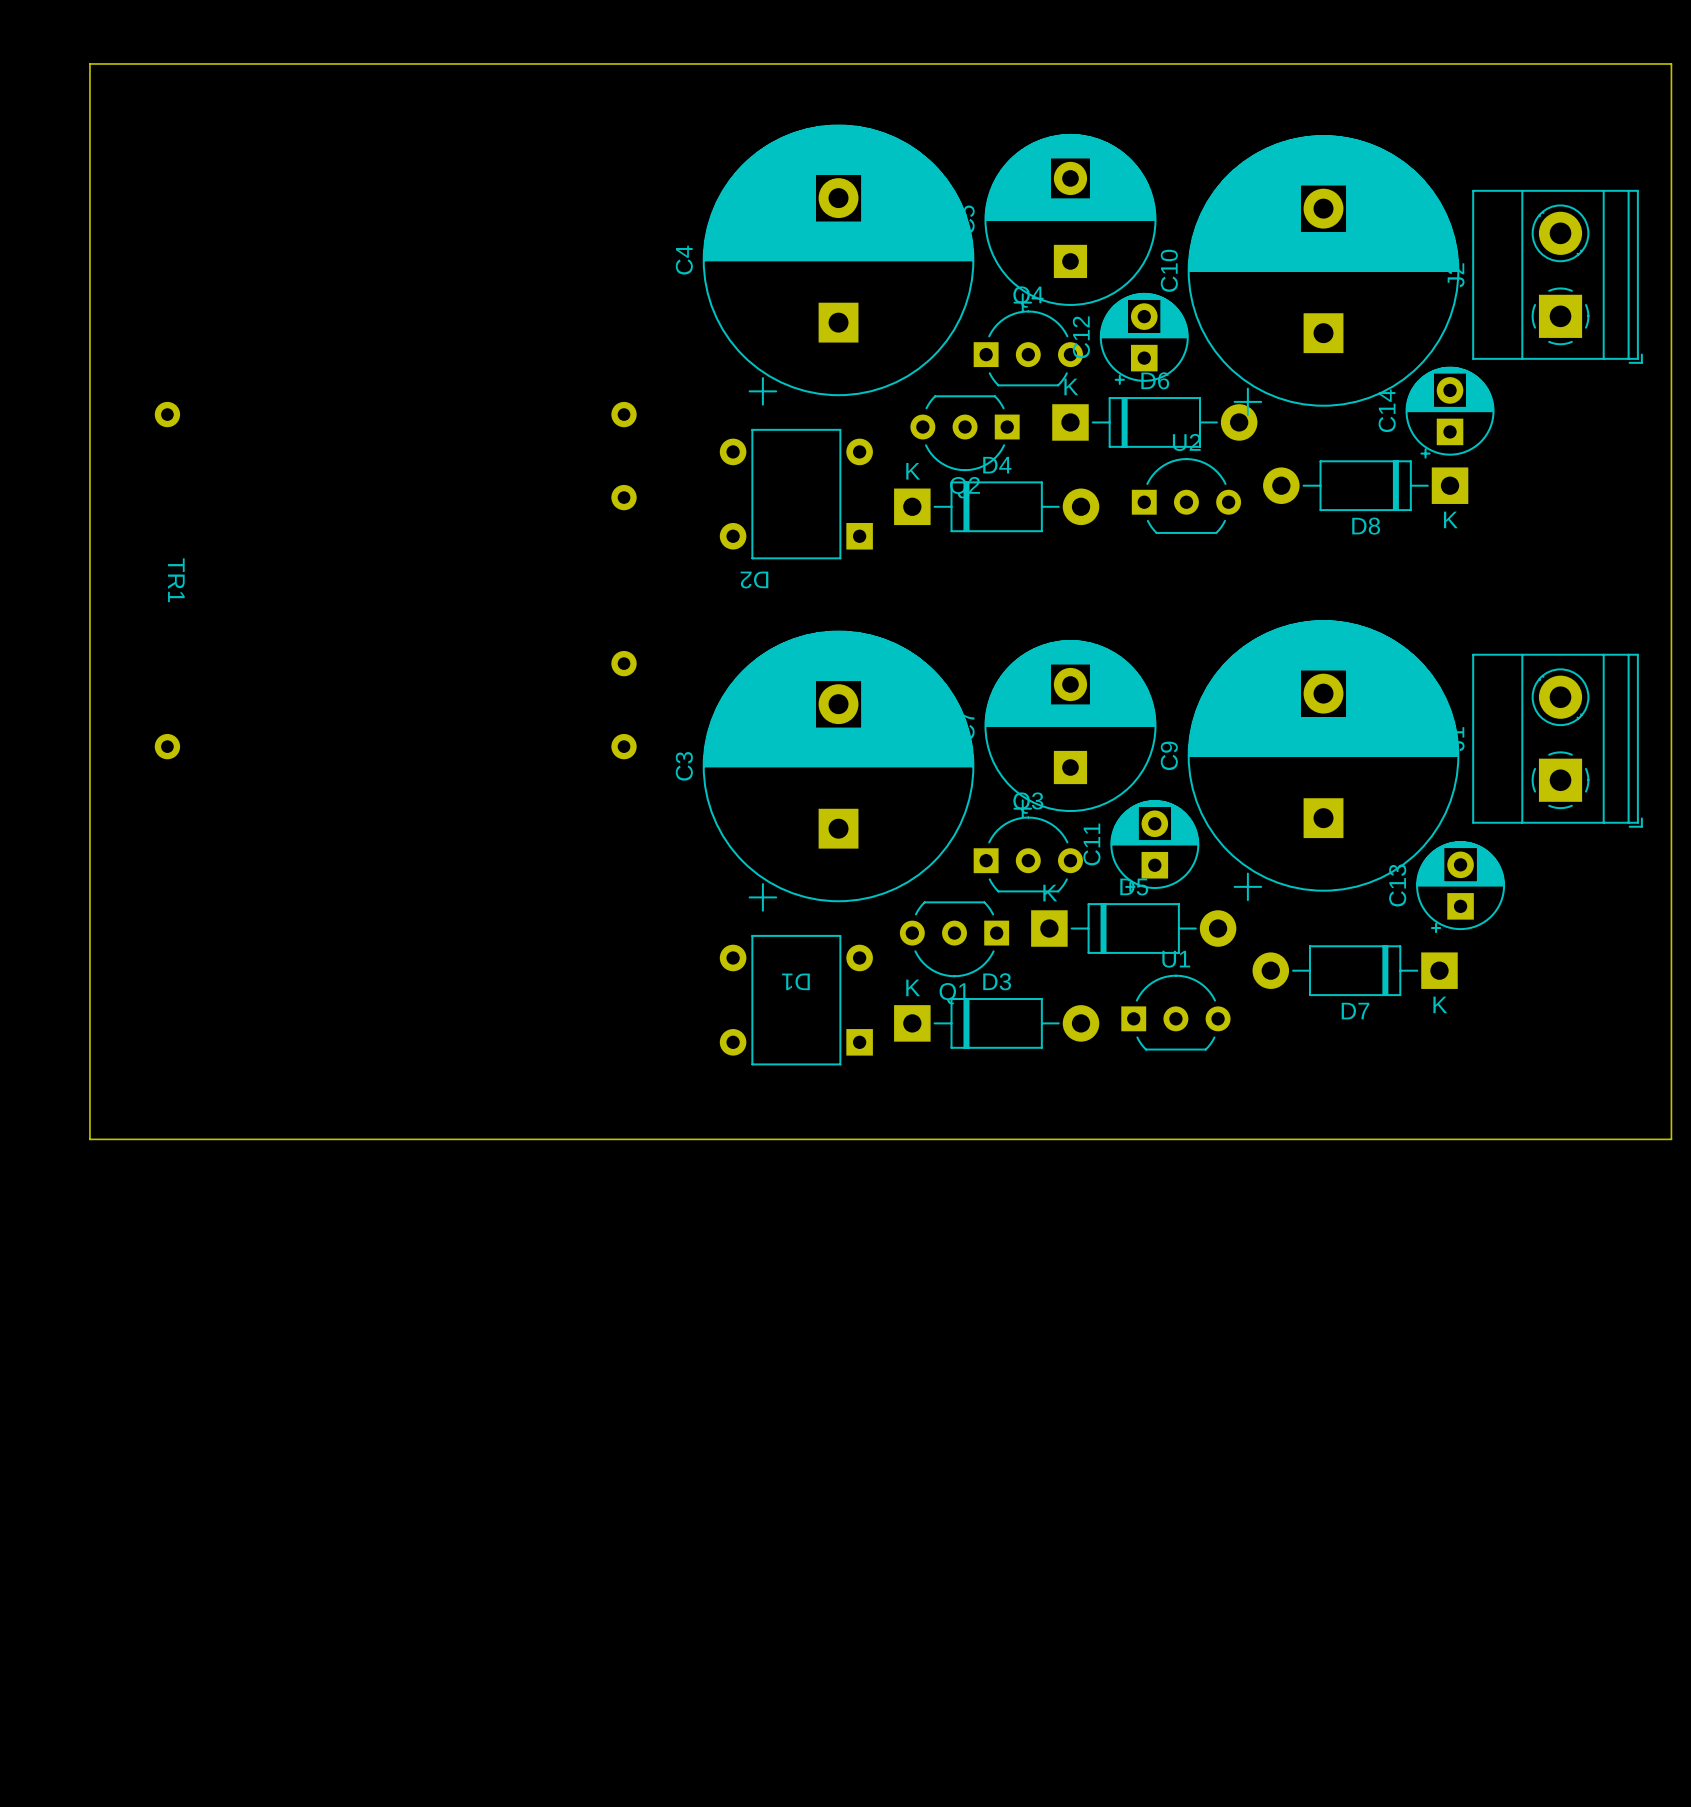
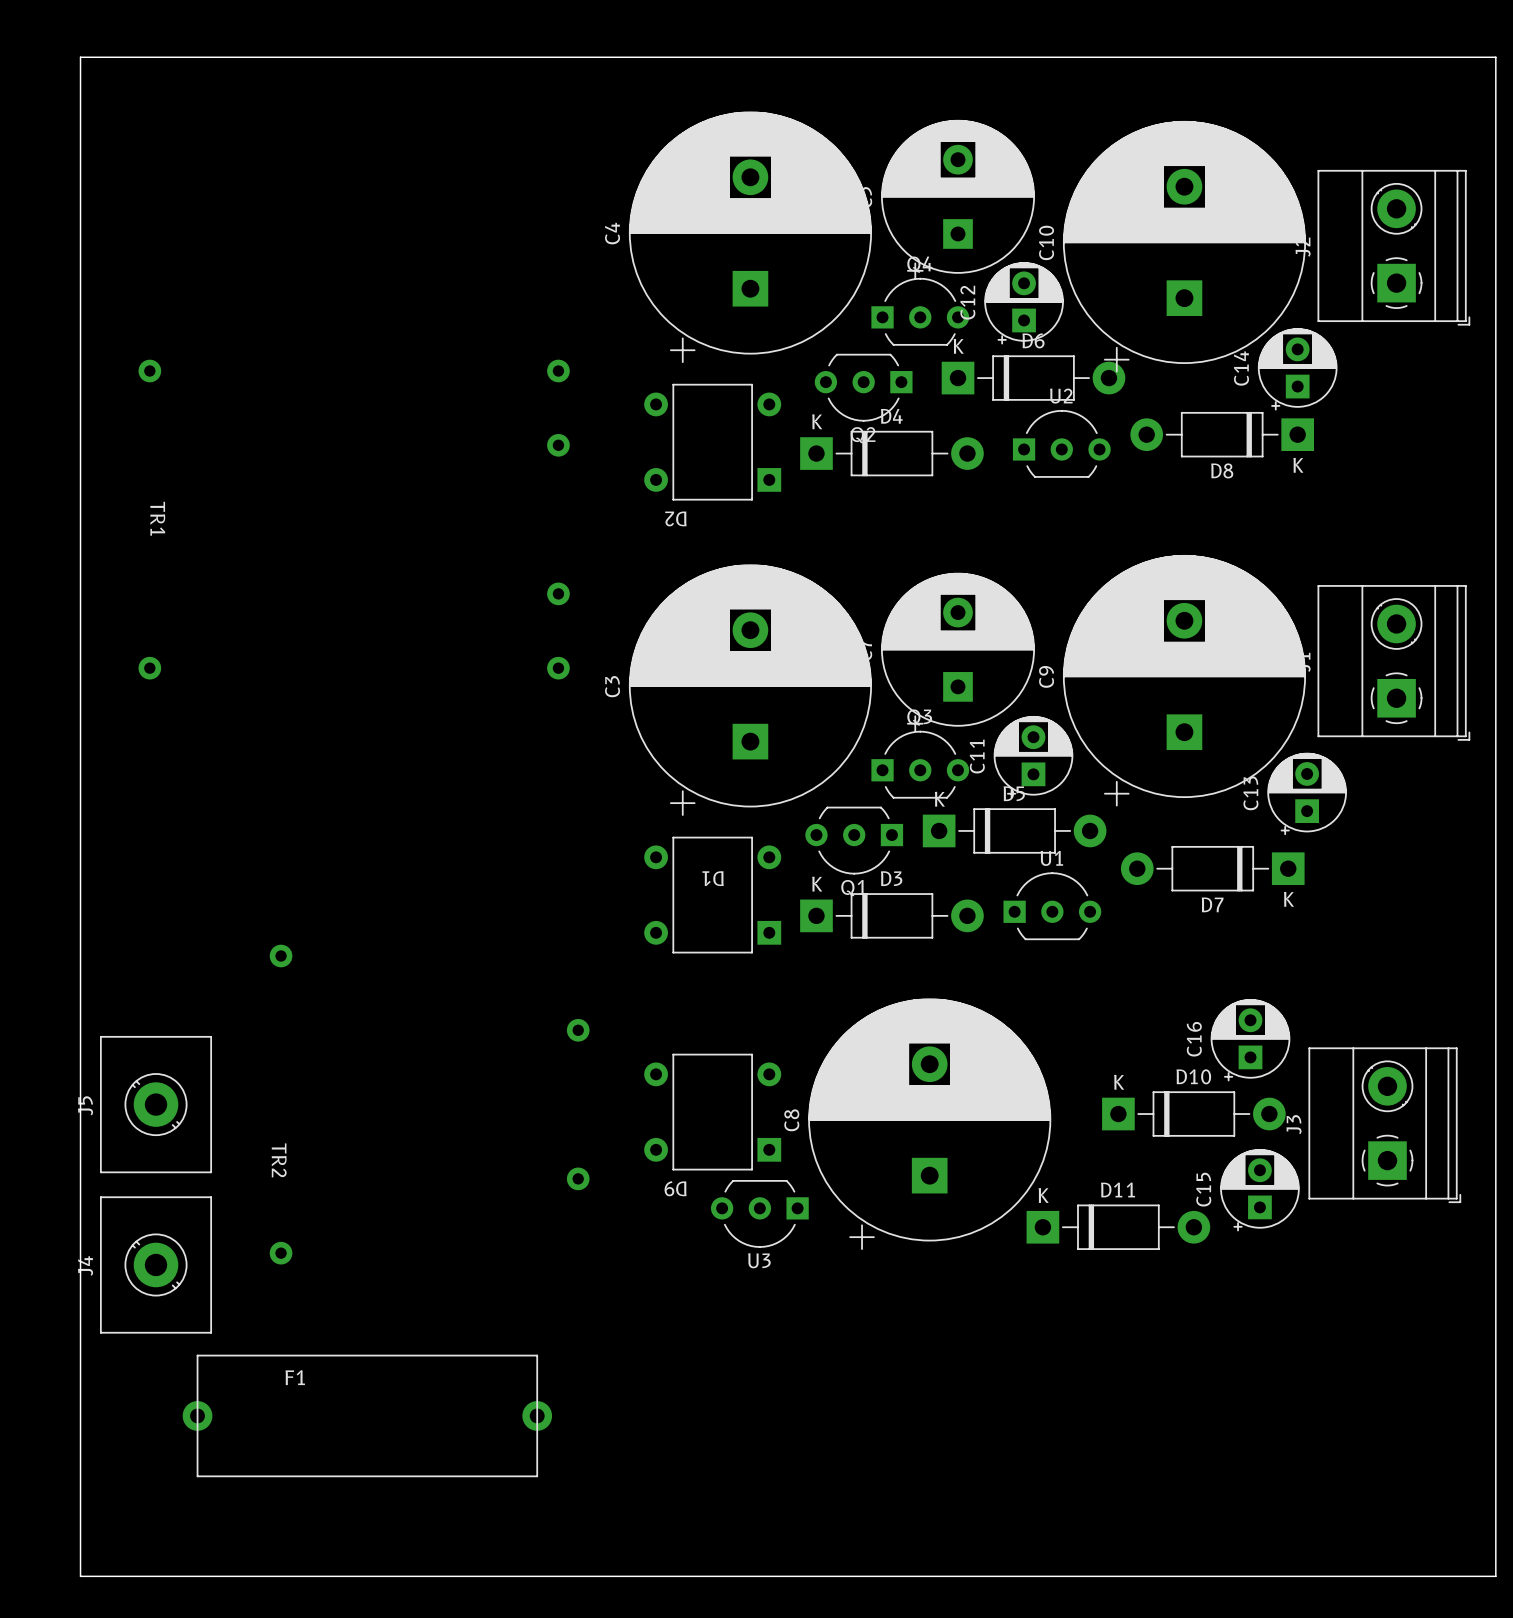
board edge: (89, 1139) (1671, 1139) -> (80, 1019) (80, 1576) (1495, 1576) (1495, 1019)
C16: none -> (1250, 1040)
J5: none -> (156, 1104)
TR2: none -> (429, 1104)
D9: none -> (712, 1112)
D10: none -> (1193, 1114)
C8: none -> (929, 1124)
J3: none -> (1384, 1125)
C15: none -> (1259, 1190)
U3: none -> (759, 1213)
D11: none -> (1118, 1227)
J4: none -> (156, 1264)
F1: none -> (367, 1415)

